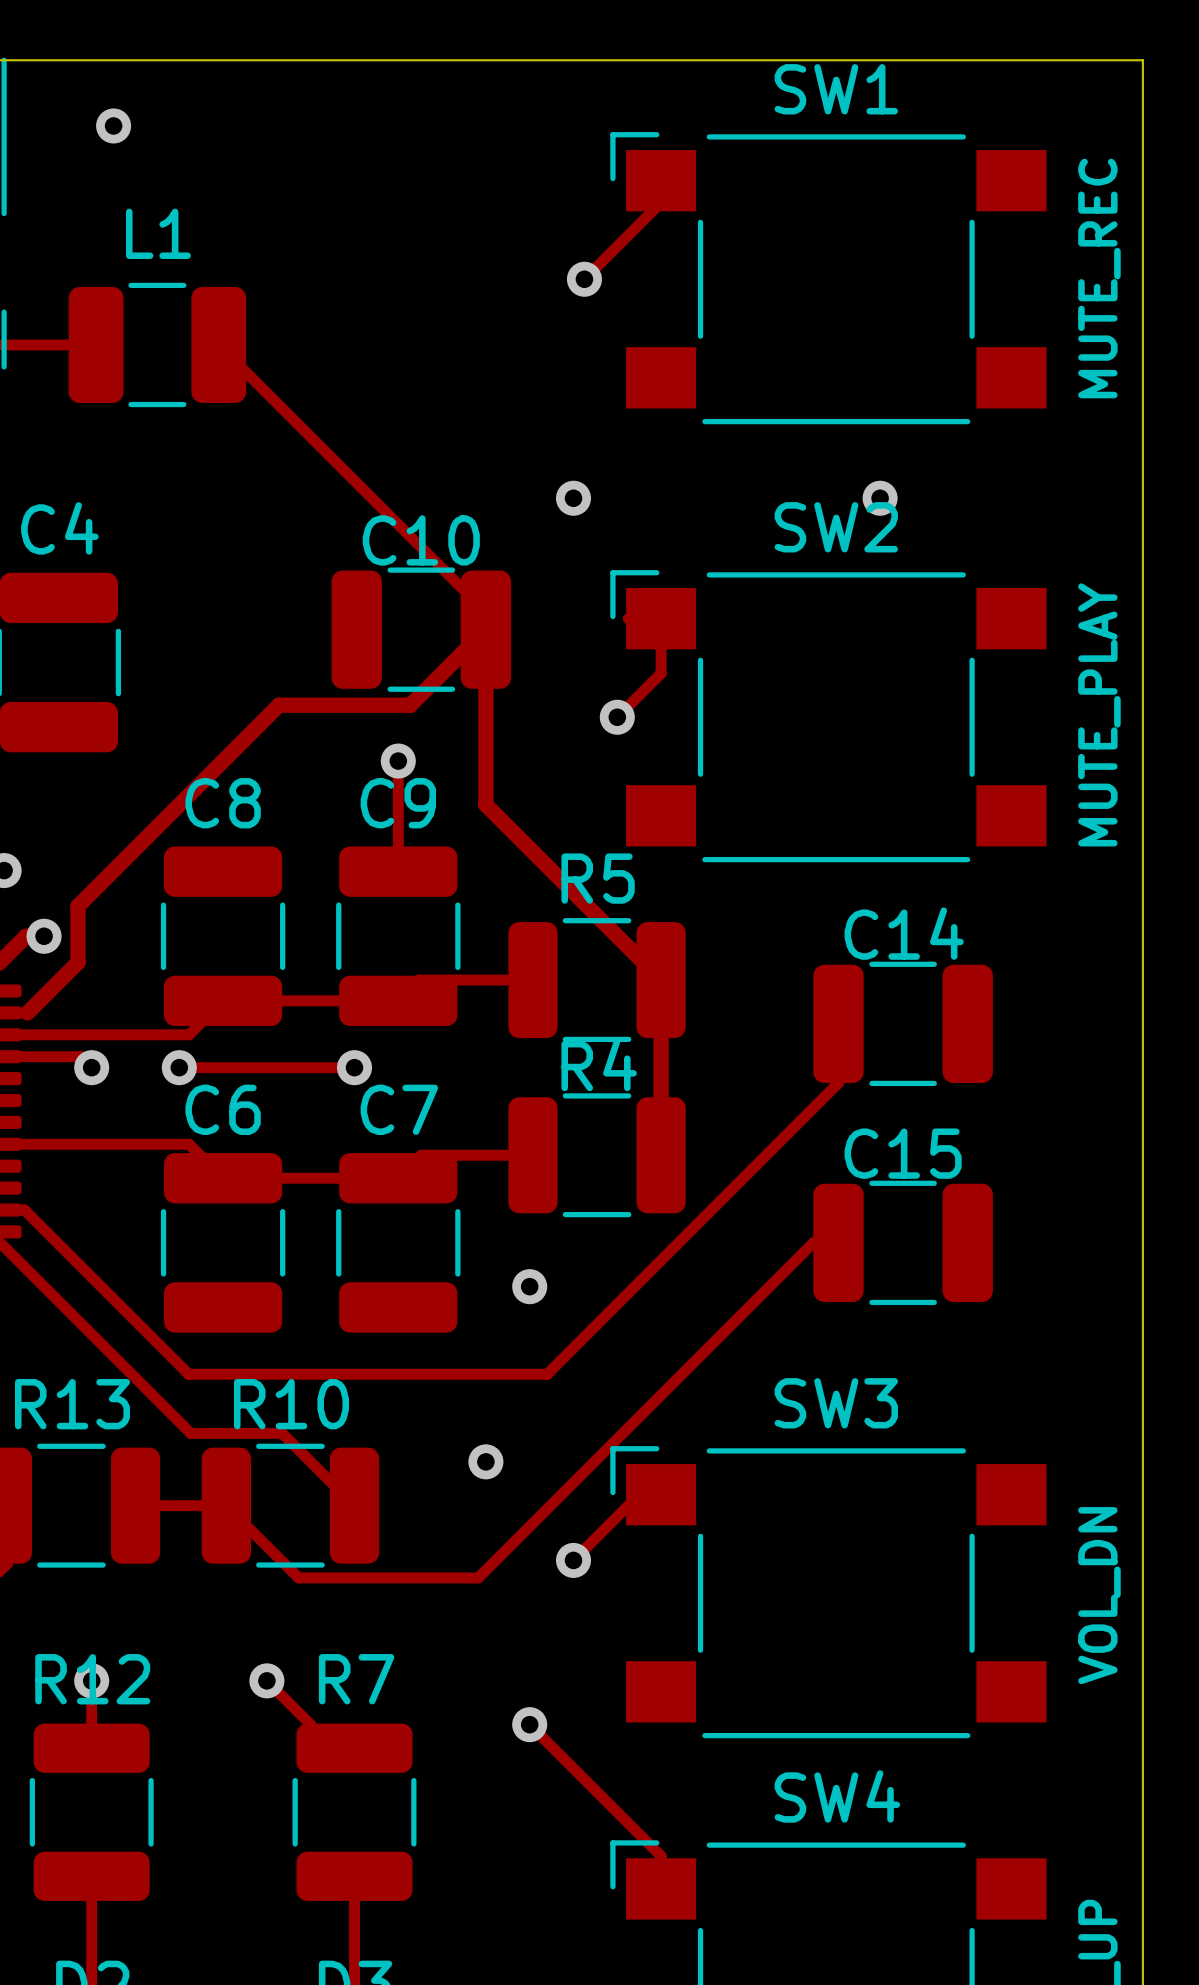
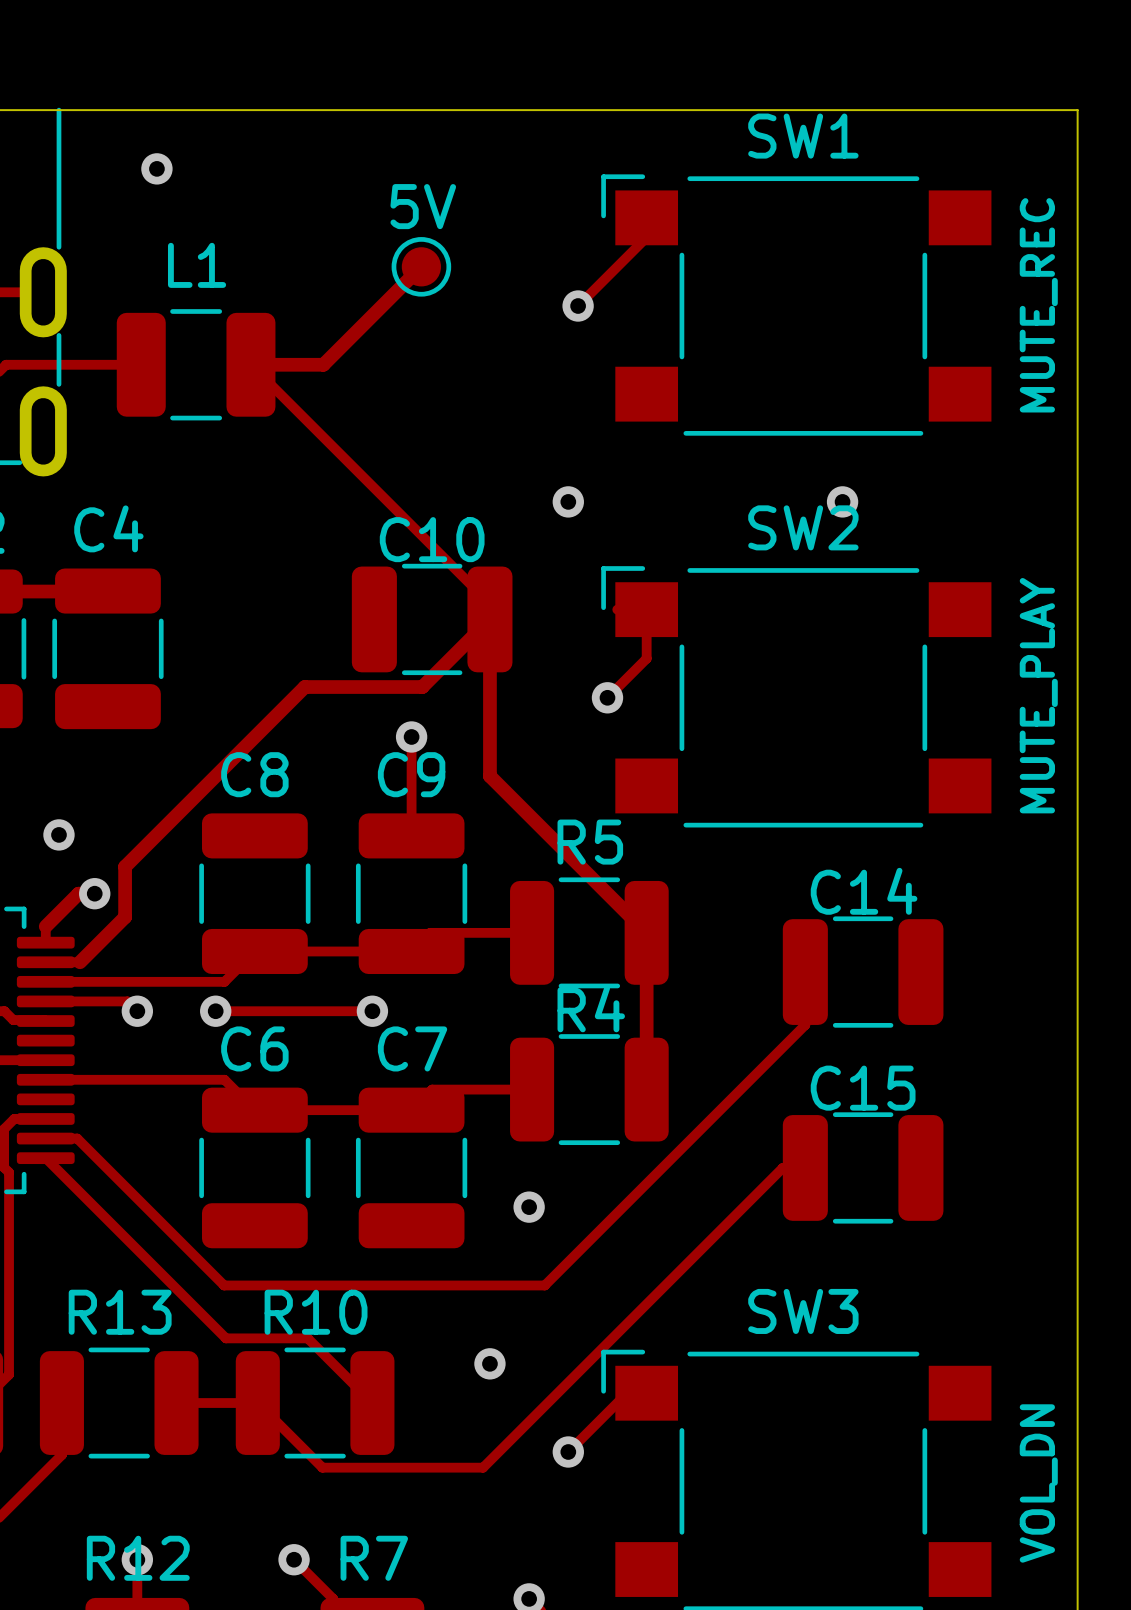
track: none -> (421, 266) (323, 364) (250, 364)
part: none -> 5V (421, 266)

